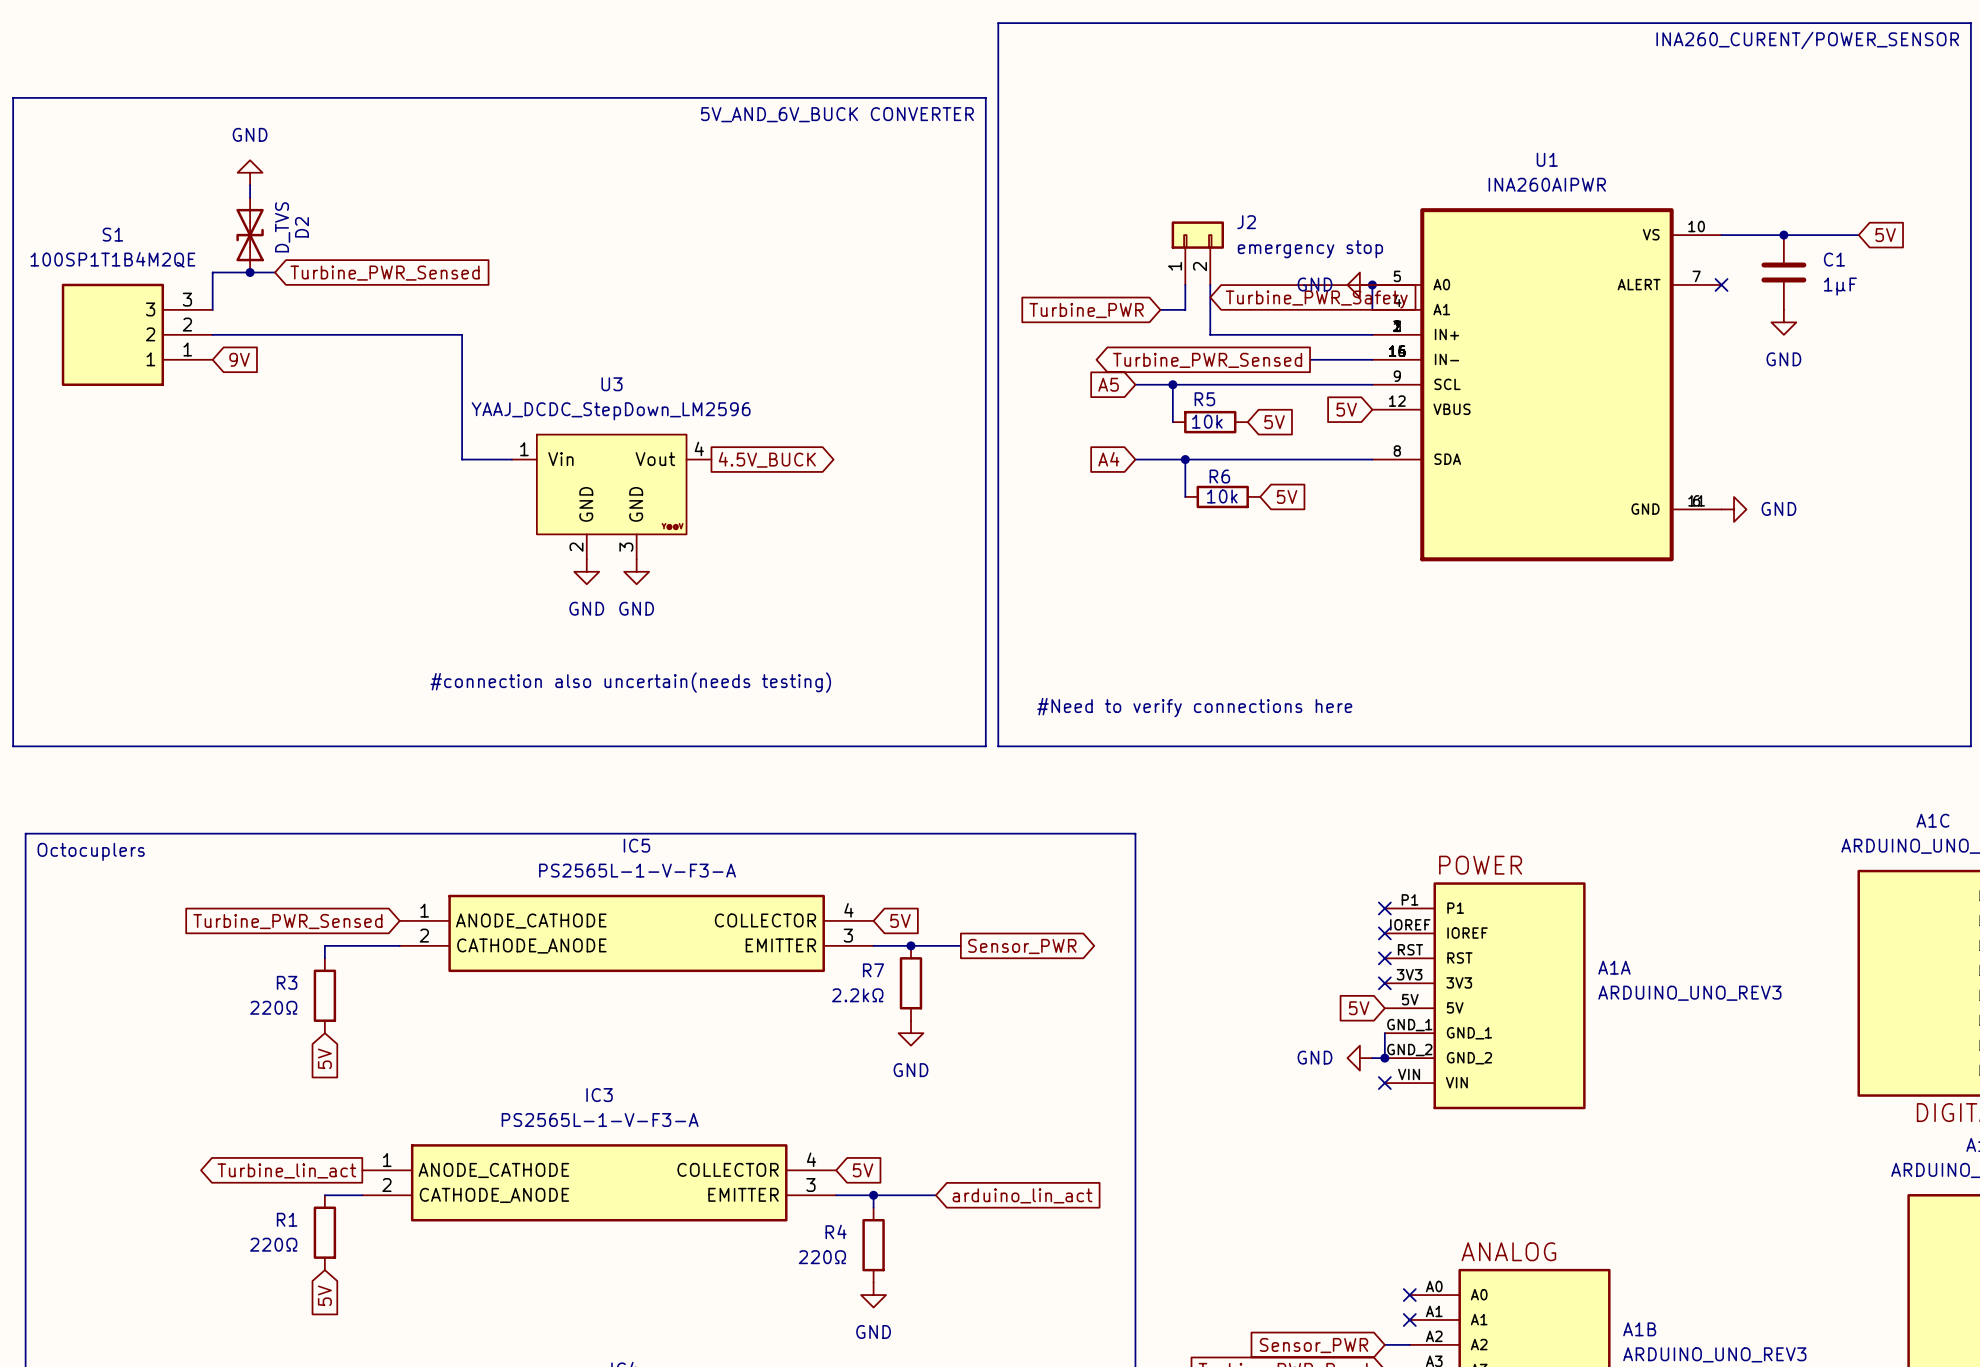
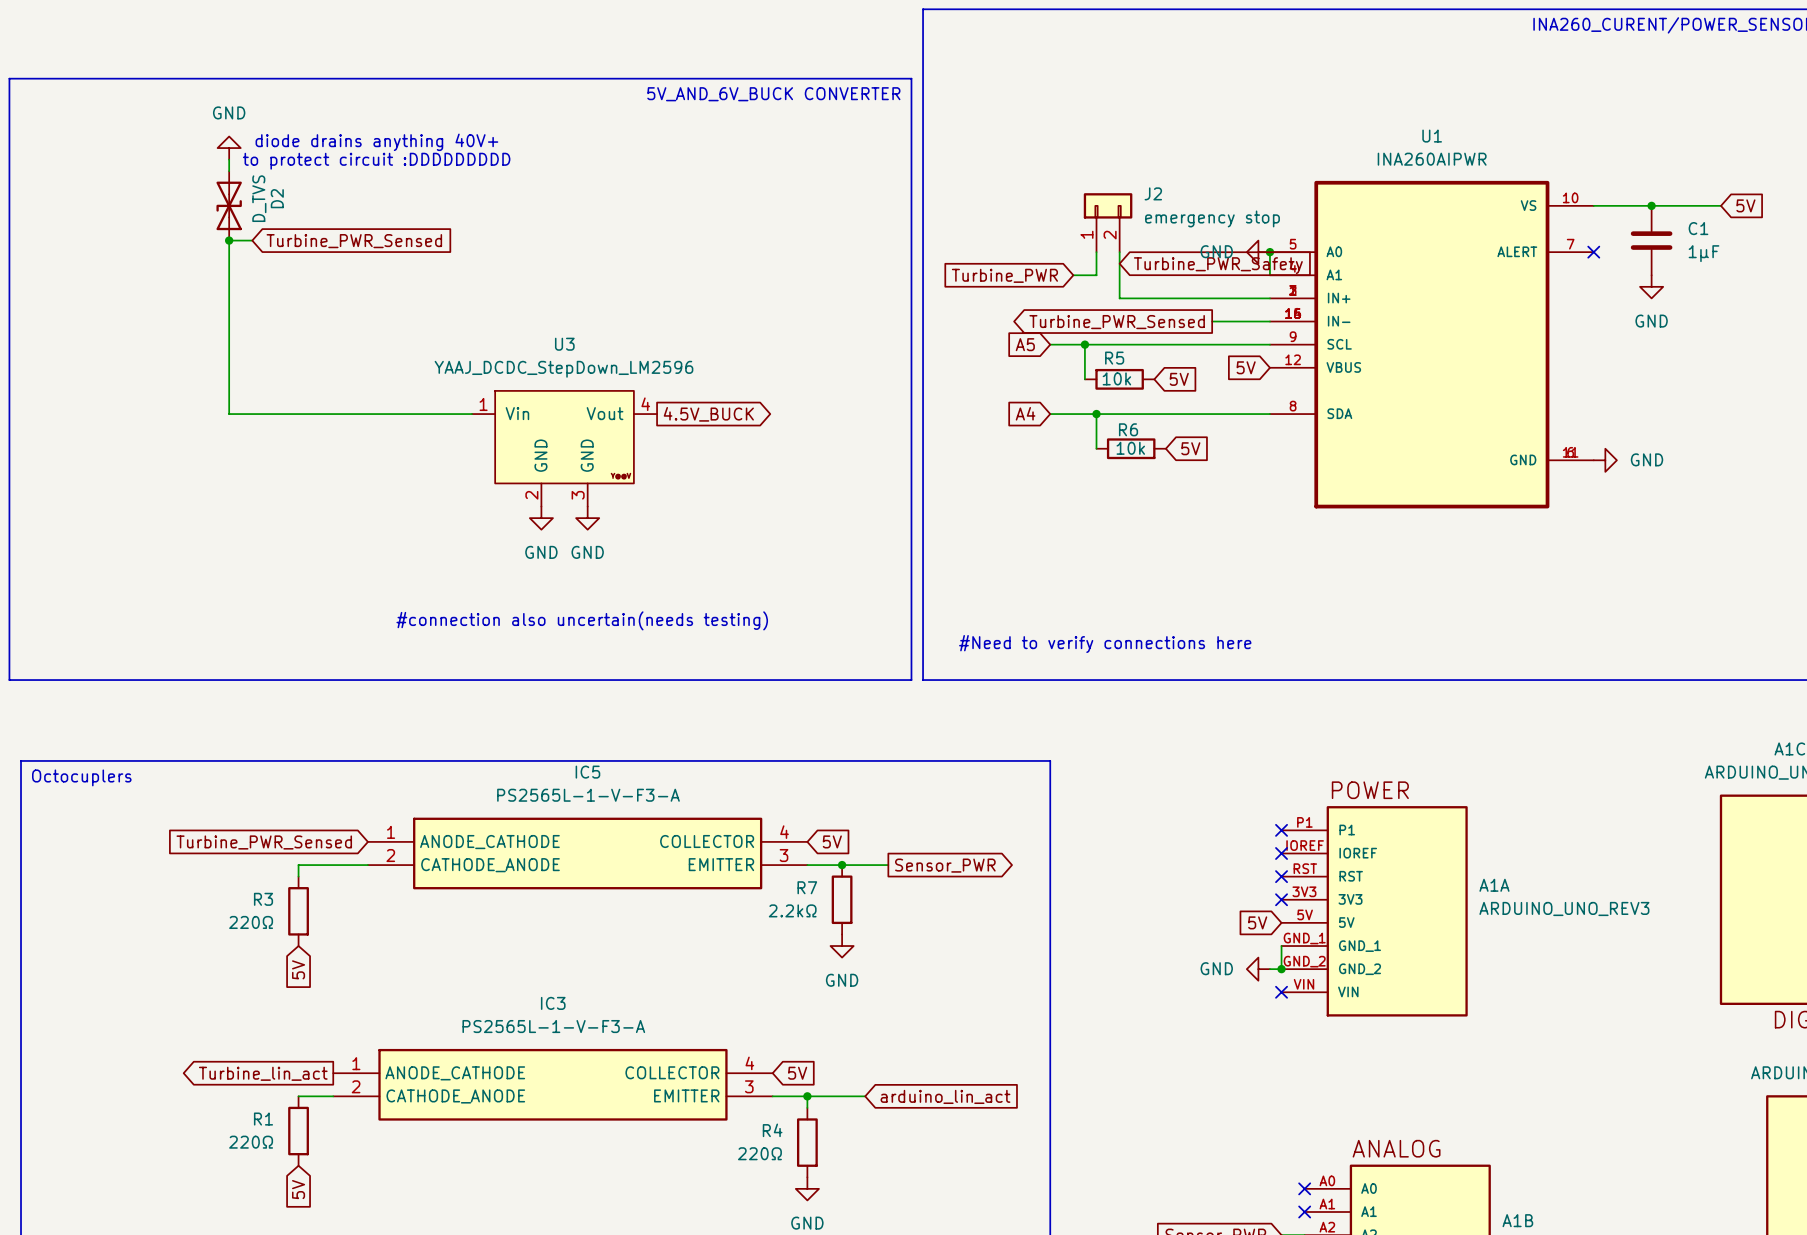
text: none -> diode drains anything 40V+ (376, 142)
text: none -> to protect circuit :DDDDDDDDD (376, 161)
wire: (250, 272) (212, 272) (212, 309) -> none
S1: 100SP1T1B4M2QE (137, 334) -> none
wire: (212, 334) (462, 334) (462, 459) -> (229, 240) (229, 414) (425, 414)
global label: 9V (239, 359) -> none

